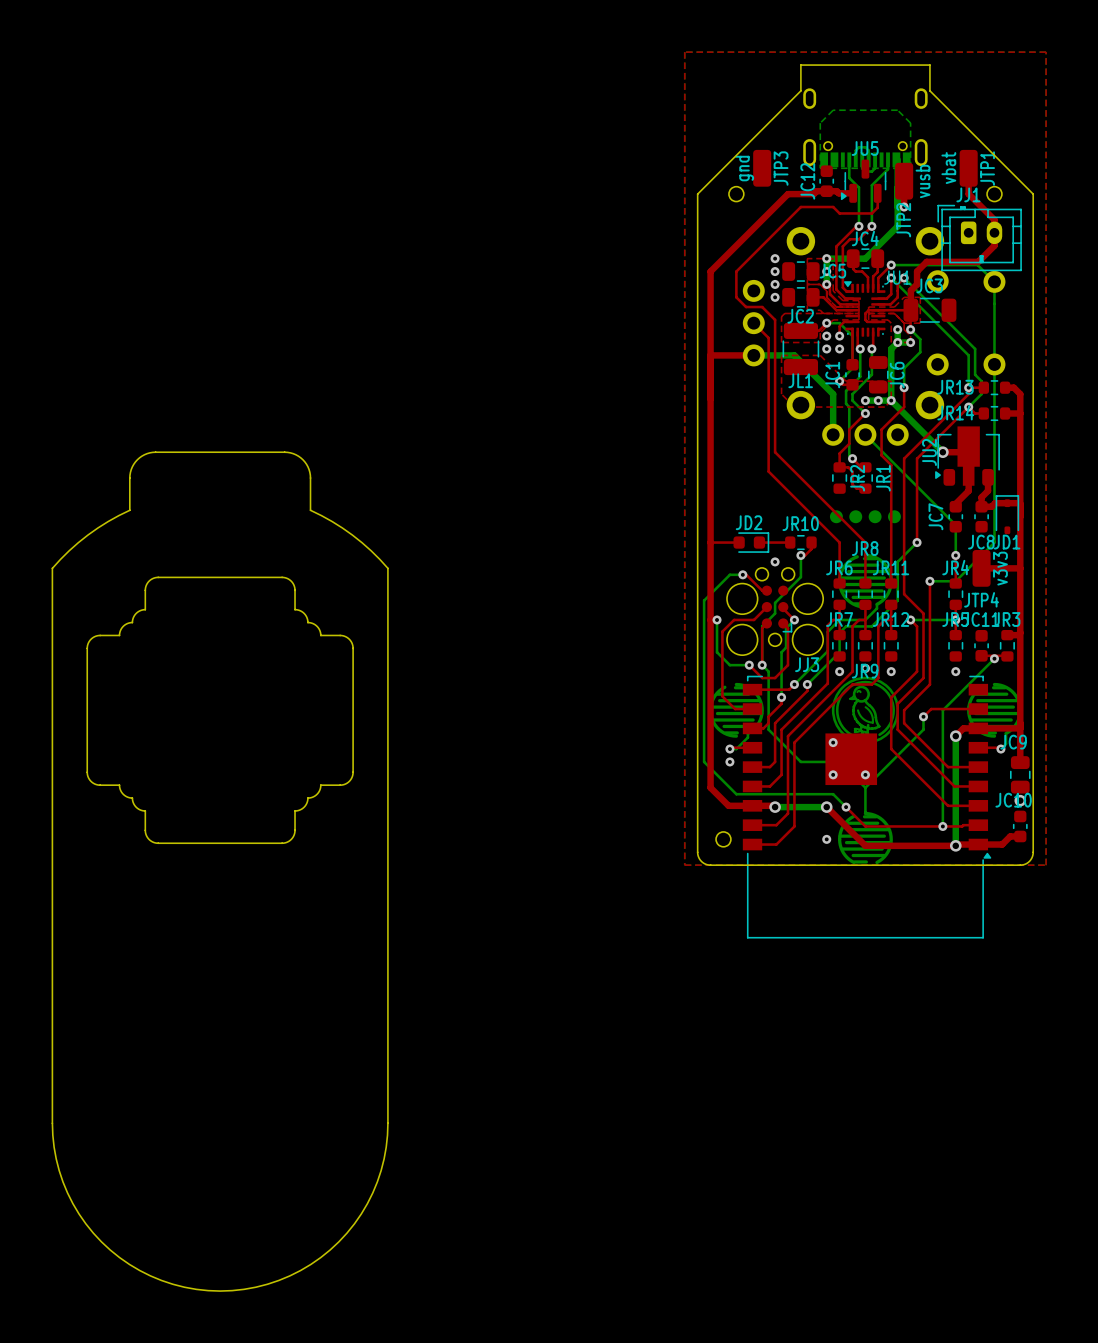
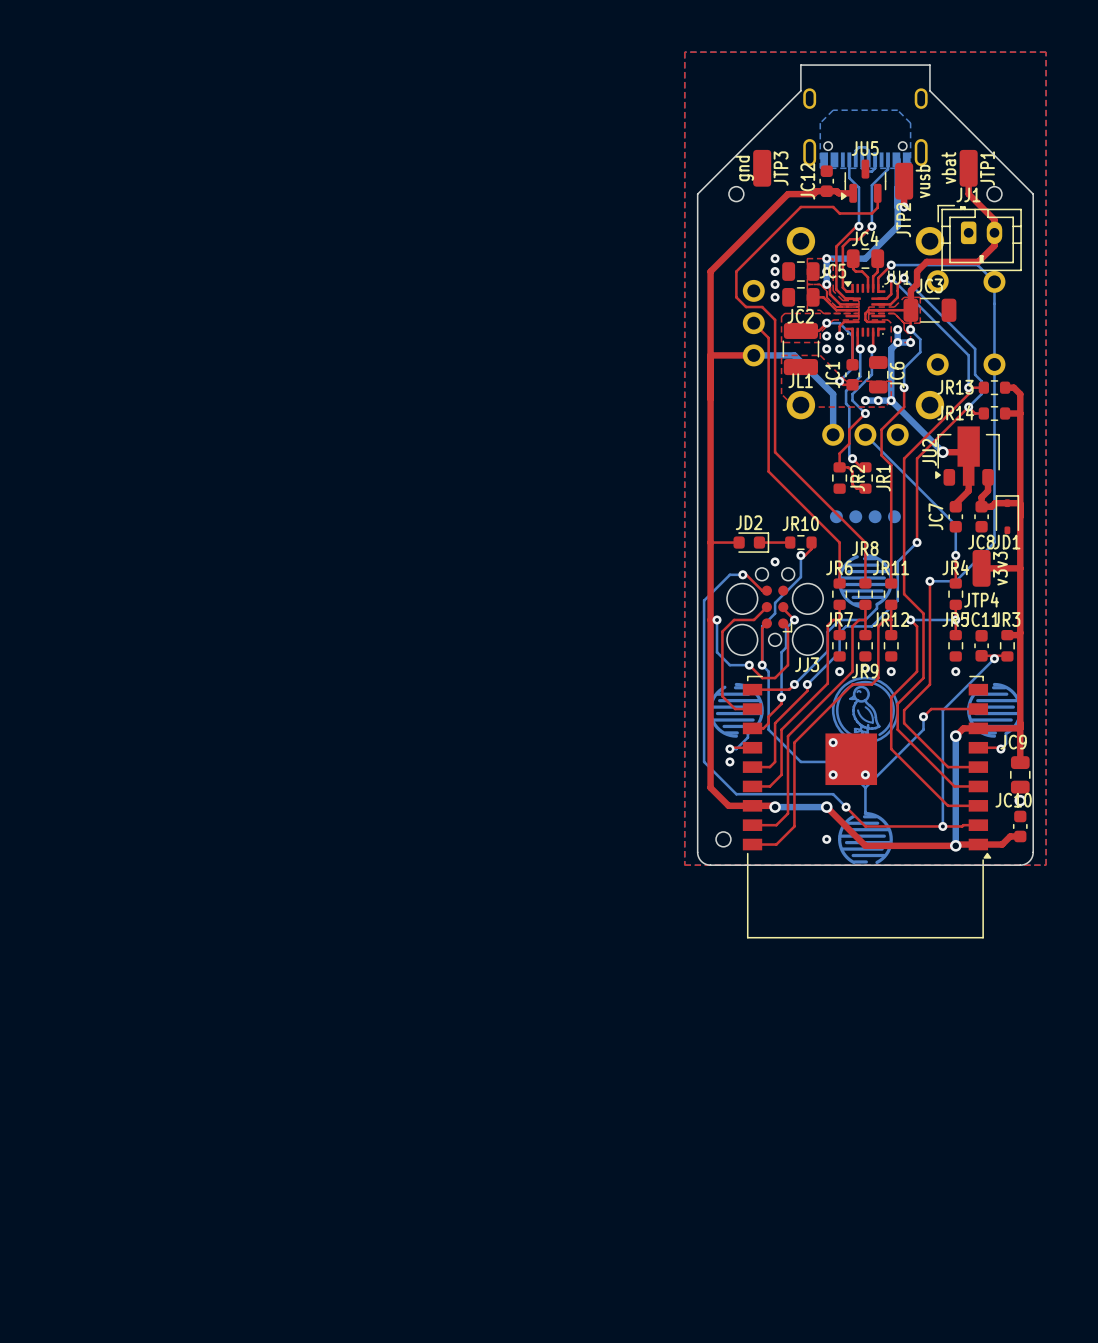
board edge: (155, 452) (284, 452) (295, 454) (304, 461) (309, 472) (310, 510) (352, 535) (387, 568) (387, 1123) (384, 1158) (372, 1192) (361, 1213) (346, 1233) (330, 1250) (300, 1270) (278, 1280) (255, 1287) (232, 1290) (196, 1289) (161, 1280) (129, 1264) (110, 1250) (85, 1223) (67, 1192) (59, 1170) (52, 1135) (52, 568) (87, 535) (129, 510) (129, 475) (132, 466) (141, 456) (155, 452) -> none
board edge: (158, 577) (286, 578) (291, 581) (294, 587) (295, 609) (304, 613) (307, 622) (318, 627) (320, 635) (343, 635) (351, 642) (352, 776) (348, 782) (343, 784) (320, 785) (317, 794) (307, 798) (303, 808) (295, 810) (294, 833) (287, 841) (153, 842) (148, 838) (145, 833) (145, 810) (137, 808) (132, 798) (123, 794) (119, 785) (97, 784) (88, 777) (87, 644) (92, 638) (97, 635) (119, 635) (122, 627) (132, 622) (136, 613) (145, 609) (146, 586) (150, 580) (158, 577) -> none

